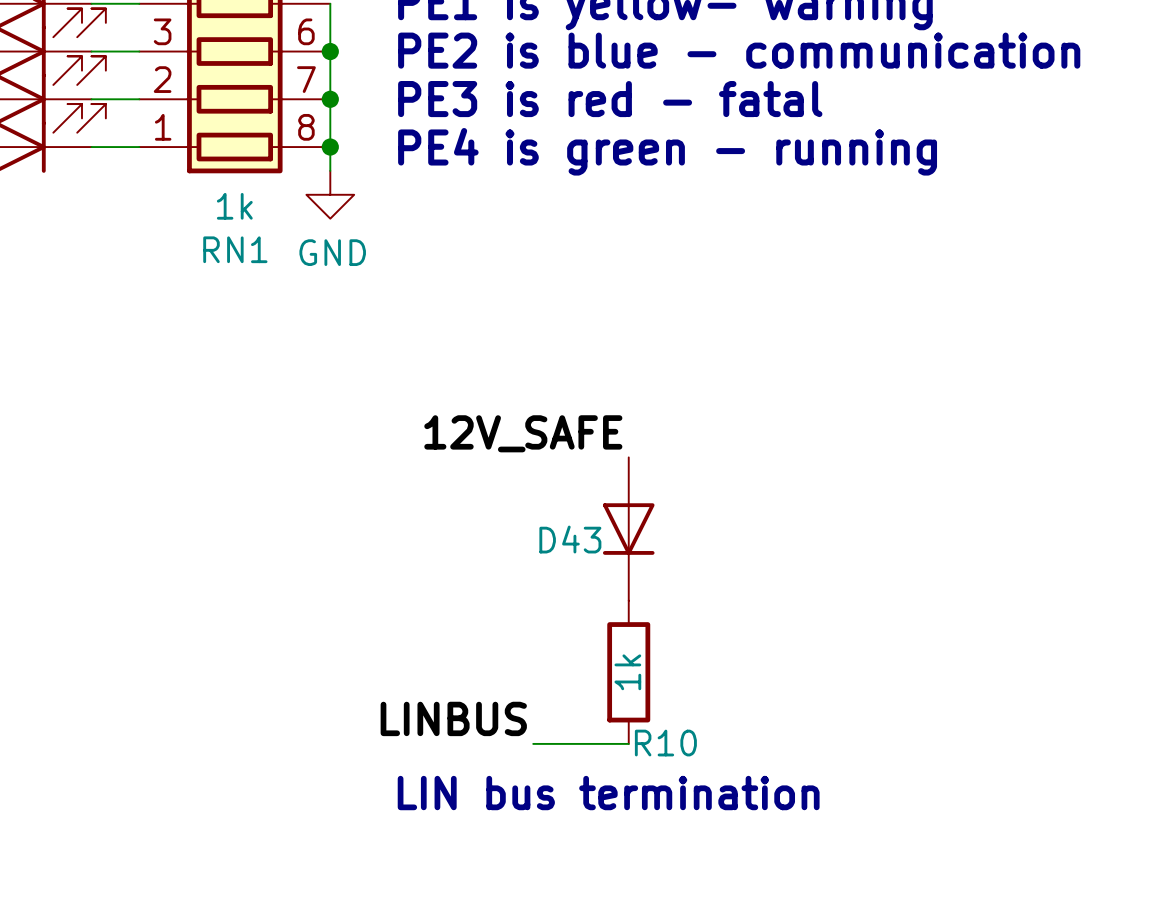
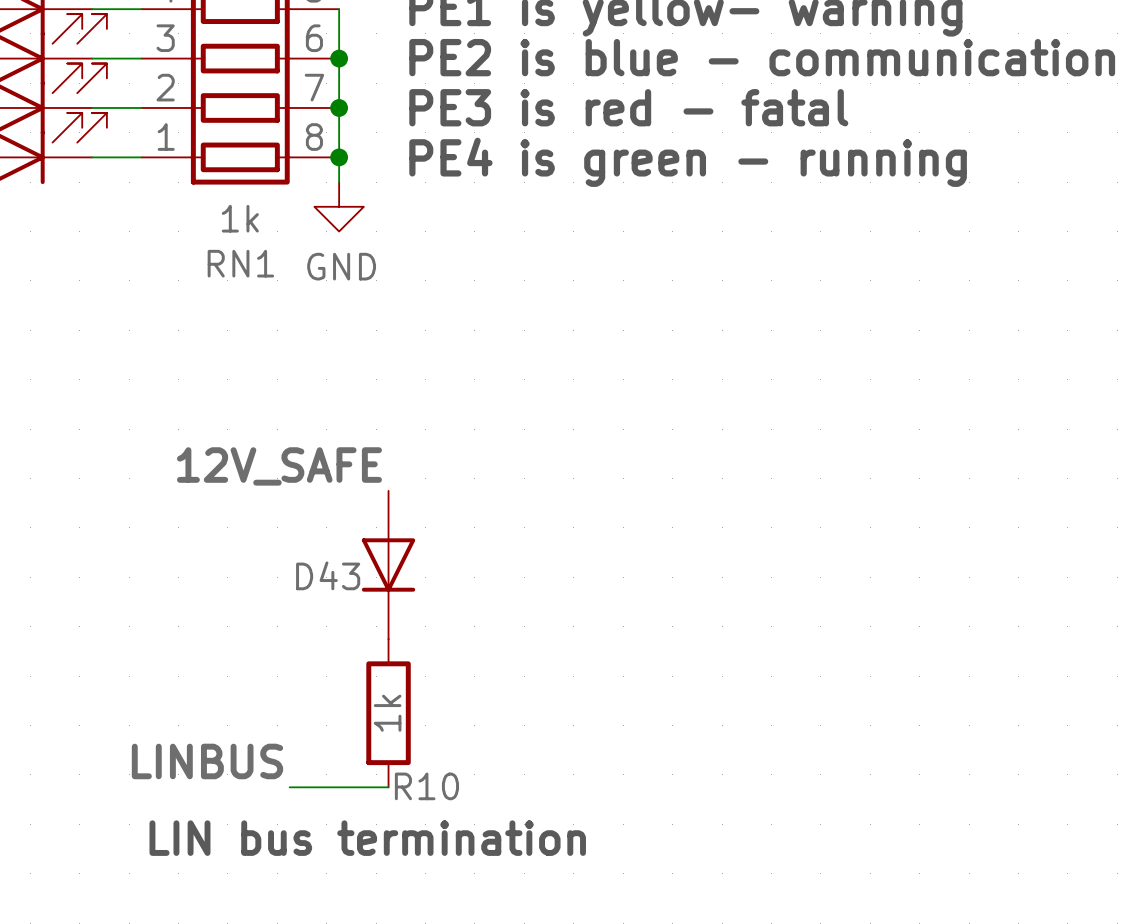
label position: 12V_SAFE (523, 433) -> 12V_SAFE (279, 466)
D43 position: (628, 529) -> (388, 565)
R10 position: (628, 672) -> (388, 713)
label position: LINBUS (453, 718) -> LINBUS (207, 761)
wire: (533, 743) (628, 743) -> (289, 787) (388, 787)
text position: LIN bus termination (608, 793) -> LIN bus termination (367, 838)

